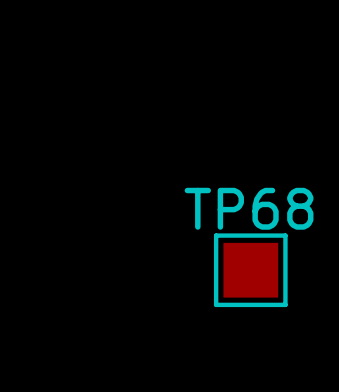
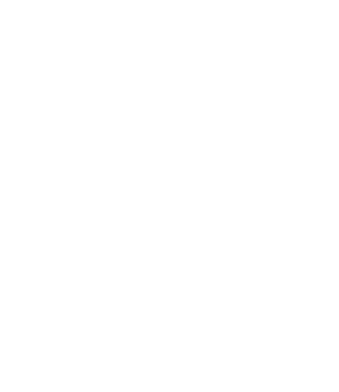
TP68: (250, 270) -> none

